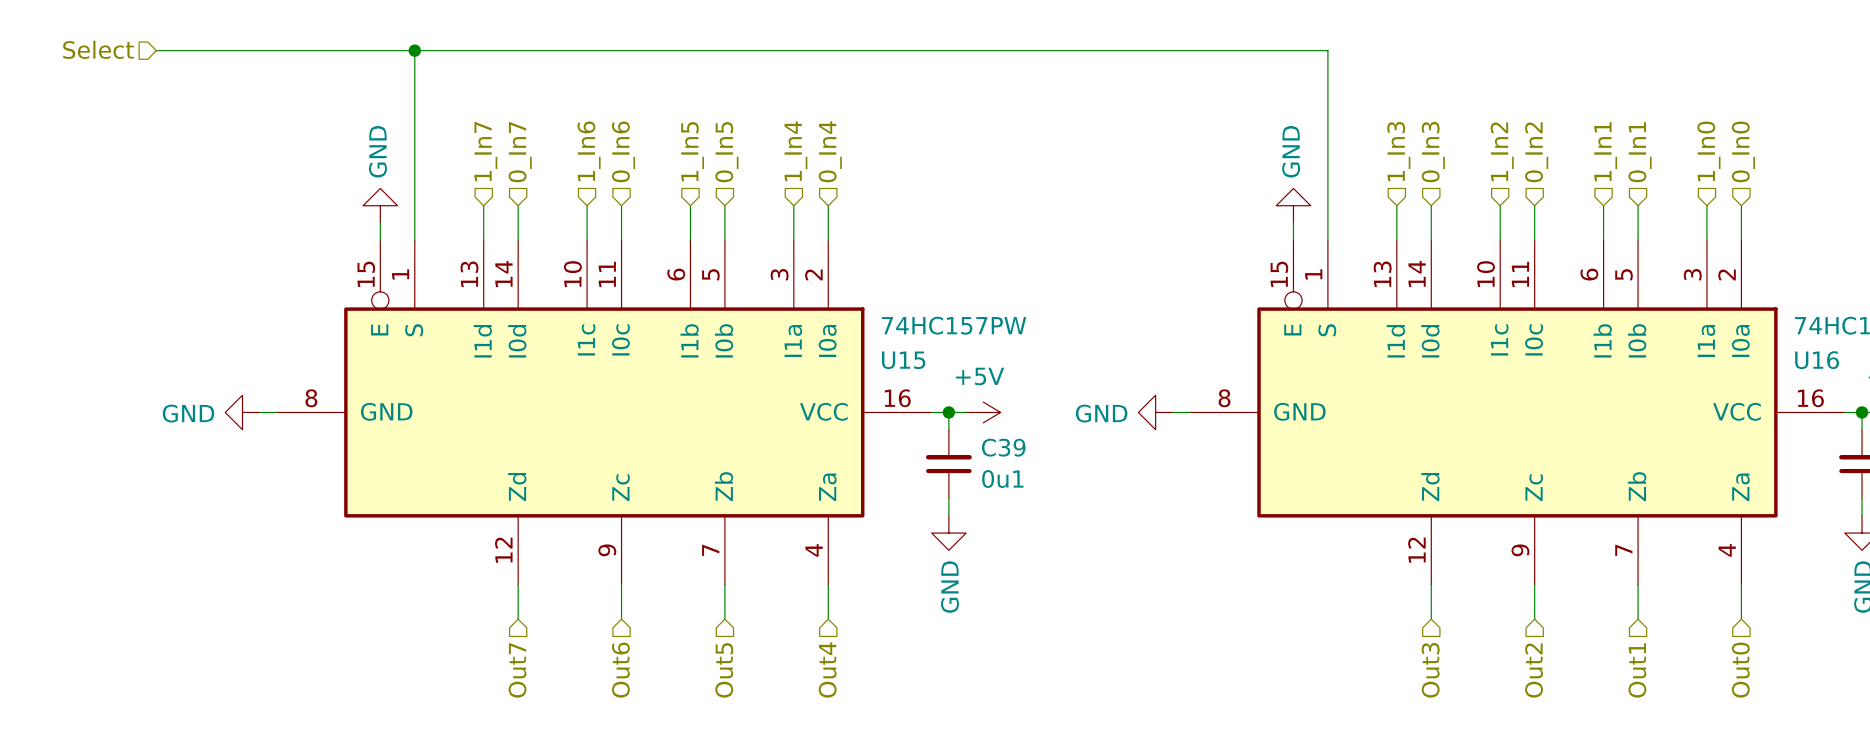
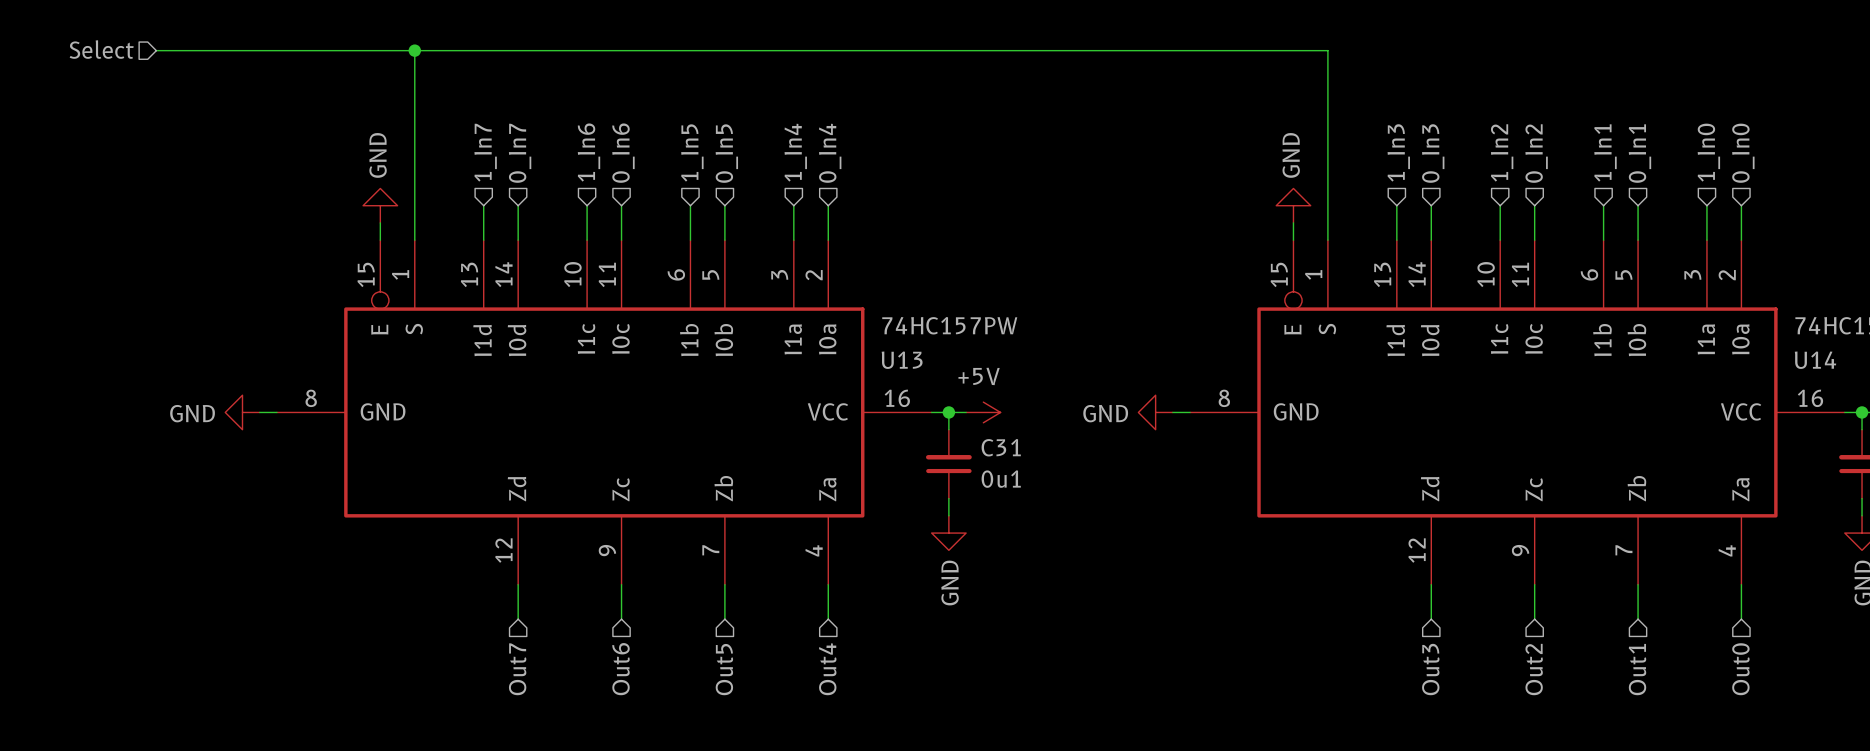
U15 name: U15 (903, 360) -> U13 (902, 360)
U16 name: U16 (1817, 360) -> U14 (1815, 360)
C39 name: C39 (1003, 447) -> C31 (1001, 447)

